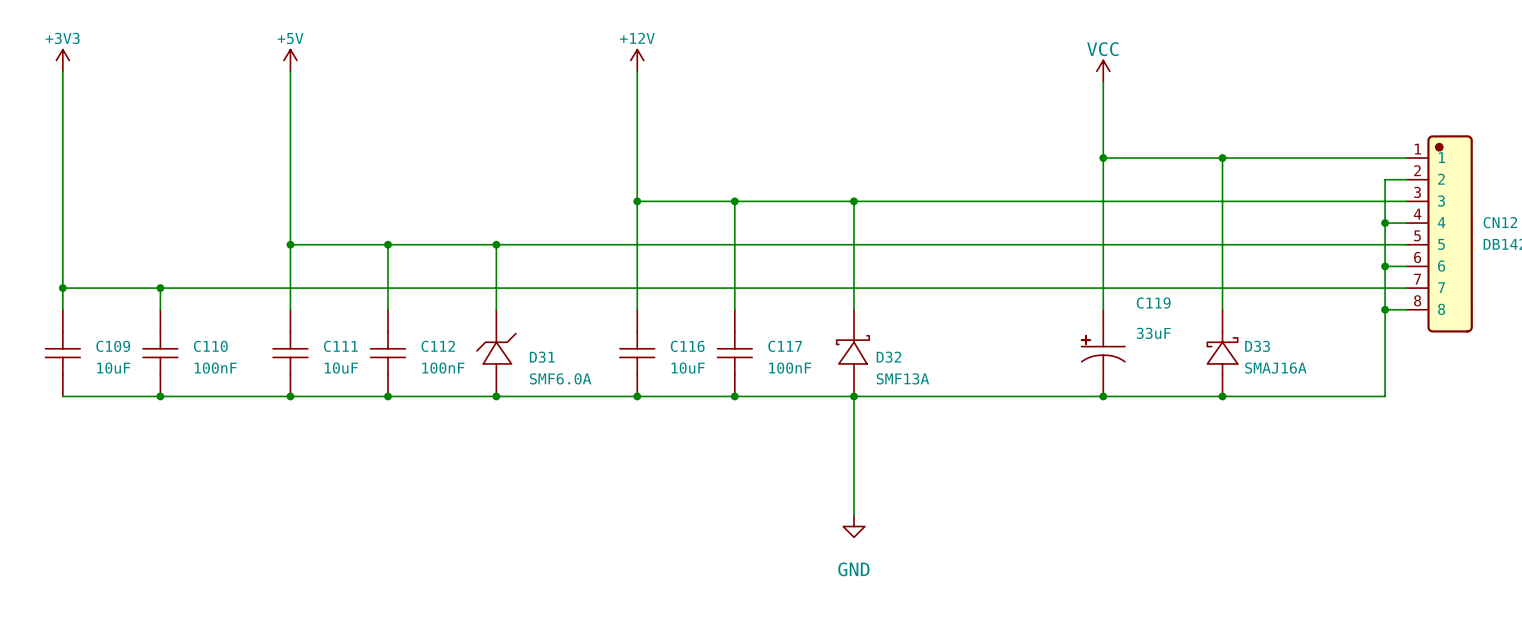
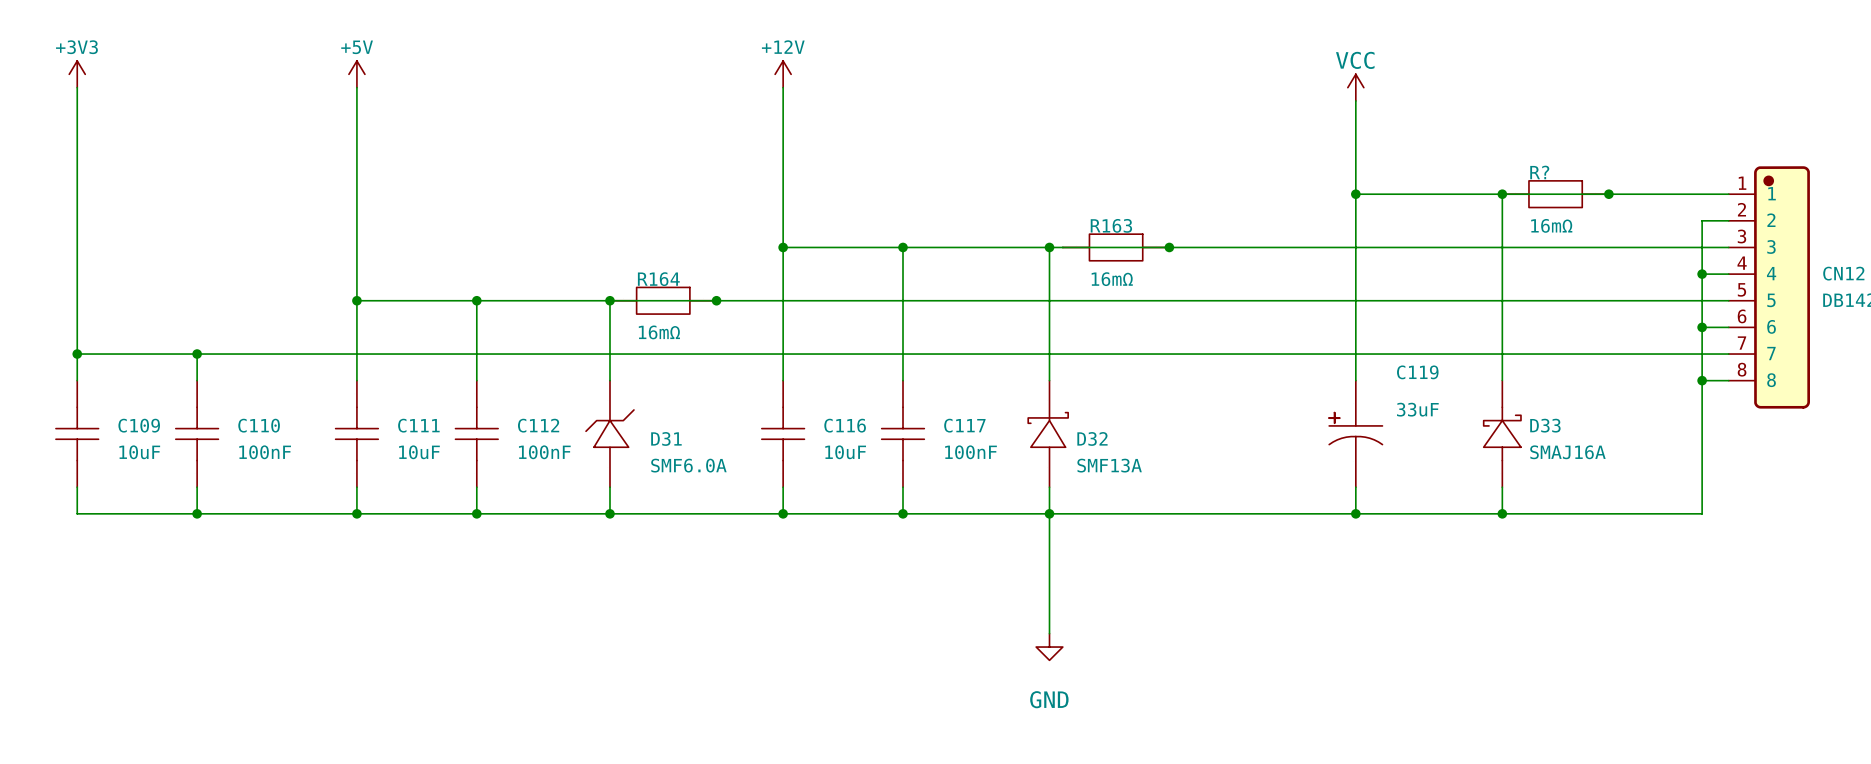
R?: none -> 16mΩ (1555, 194)
junction: none -> (1608, 194)
R163: none -> 16mΩ (1116, 247)
junction: none -> (1169, 247)
R164: none -> 16mΩ (663, 300)
junction: none -> (716, 300)
wire: (62, 396) (1385, 396) -> (77, 487) (77, 513) (1702, 513) (1702, 487)
wire: none -> (197, 487) (197, 513)
junction position: (160, 396) -> (197, 513)
wire: none -> (356, 487) (356, 513)
junction position: (290, 396) -> (356, 513)
wire: none -> (476, 487) (476, 513)
junction position: (387, 396) -> (476, 513)
wire: none -> (609, 487) (609, 513)
junction position: (496, 396) -> (609, 513)
wire: none -> (783, 487) (783, 513)
junction position: (637, 396) -> (783, 513)
wire: none -> (903, 487) (903, 513)
junction position: (734, 396) -> (903, 513)
junction position: (854, 396) -> (1049, 513)
wire: none -> (1355, 487) (1355, 513)
junction position: (1103, 396) -> (1355, 513)
wire: none -> (1502, 487) (1502, 513)
junction position: (1222, 396) -> (1502, 513)

